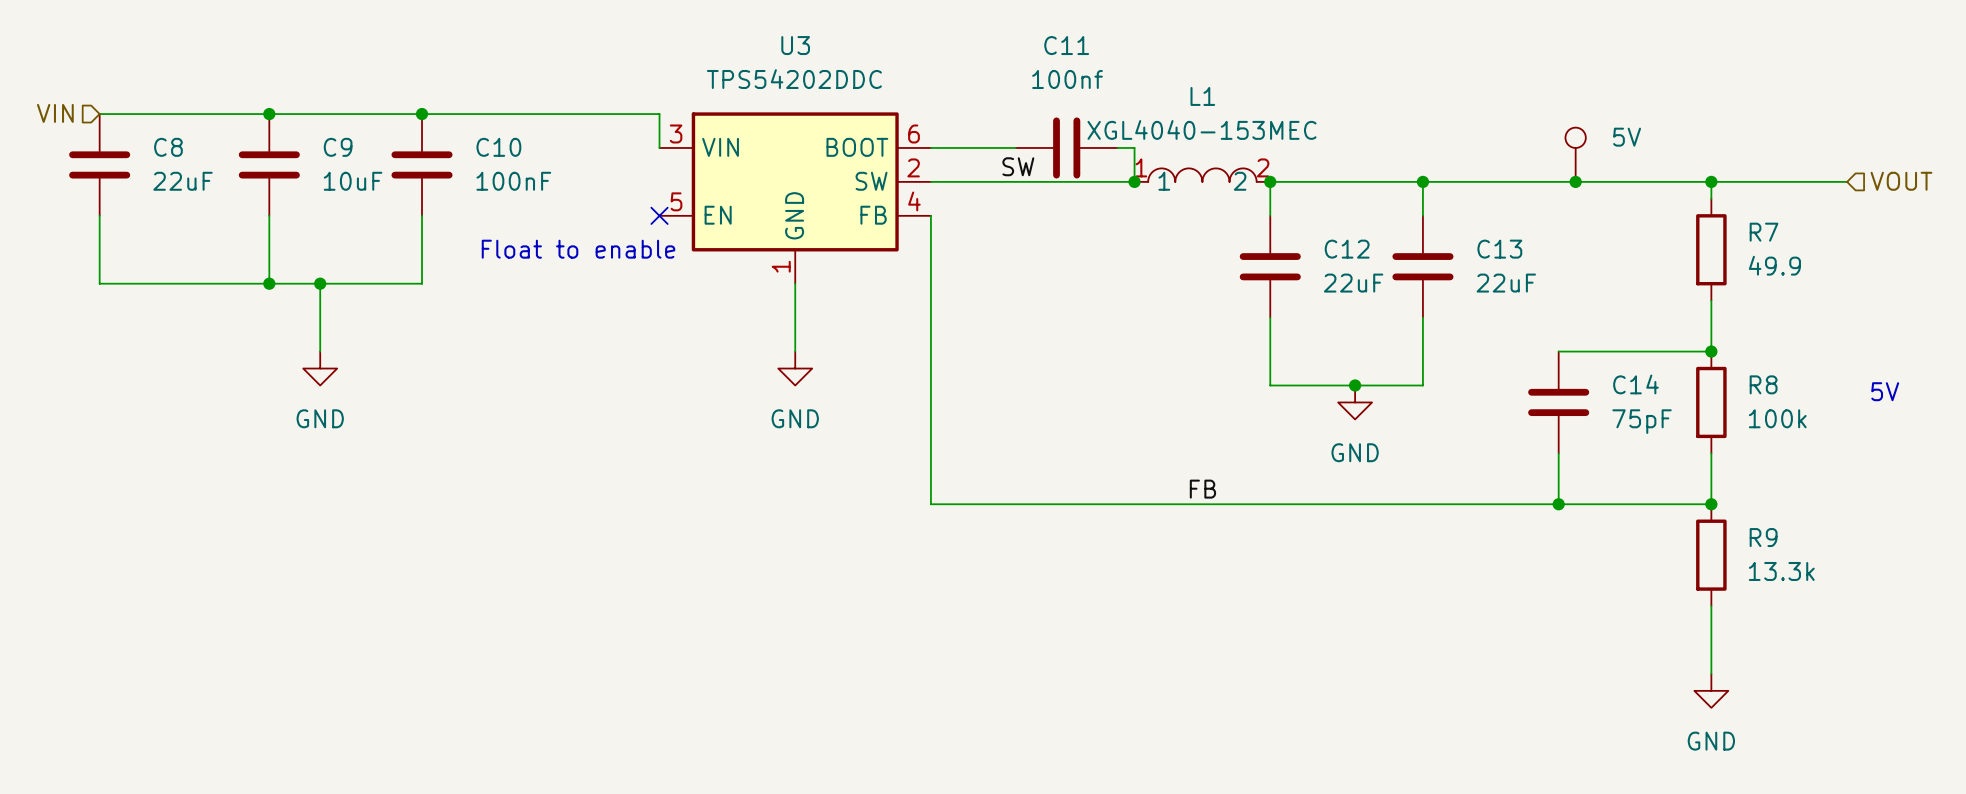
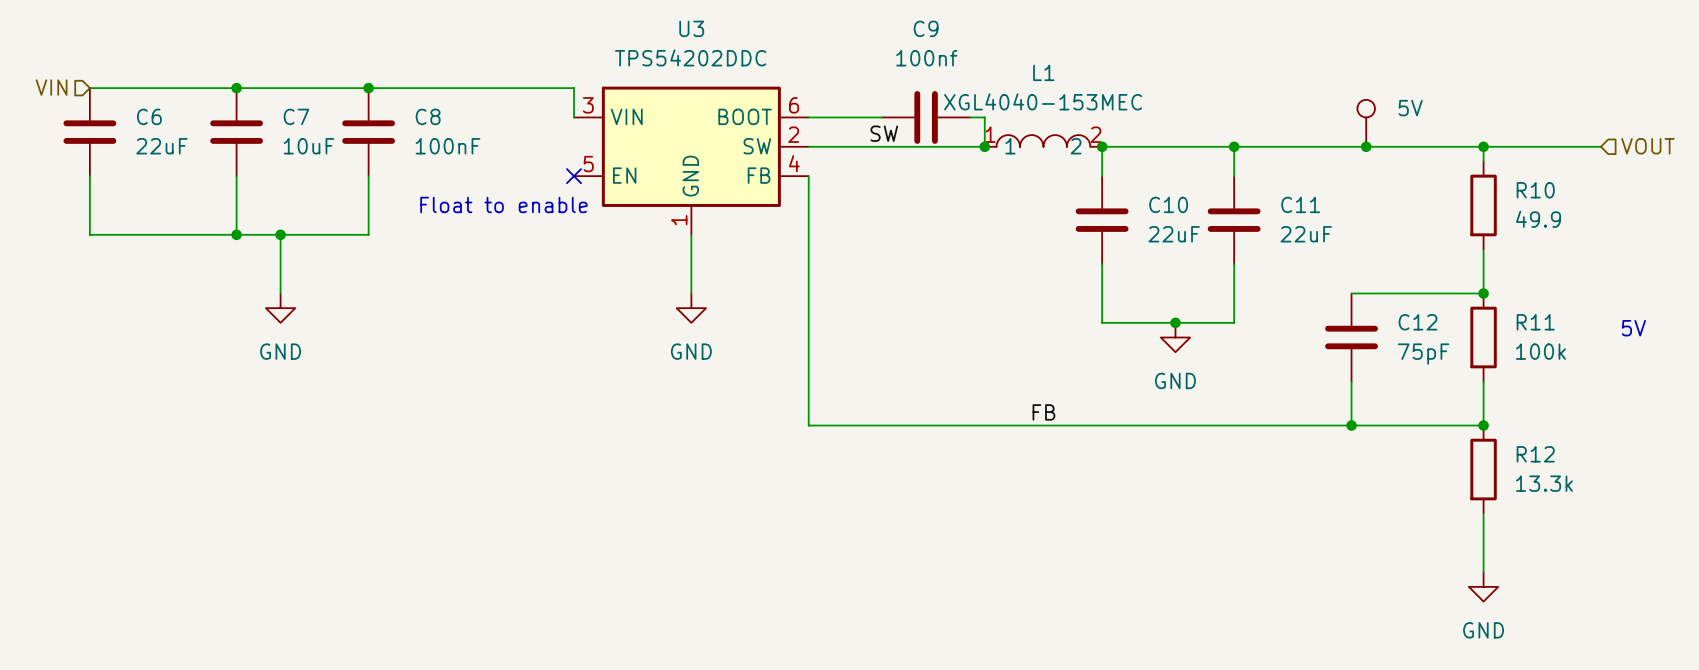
C11 name: C11 (1066, 45) -> C9 (926, 28)
C8 name: C8 (168, 147) -> C6 (149, 116)
C9 name: C9 (338, 147) -> C7 (296, 116)
C10 name: C10 (498, 147) -> C8 (428, 116)
R7 name: R7 (1764, 232) -> R10 (1535, 190)
C12 name: C12 (1347, 249) -> C10 (1168, 204)
C13 name: C13 (1499, 249) -> C11 (1300, 204)
C14 name: C14 (1635, 384) -> C12 (1418, 322)
R8 name: R8 (1763, 384) -> R11 (1535, 322)
R9 name: R9 (1763, 537) -> R12 (1535, 454)

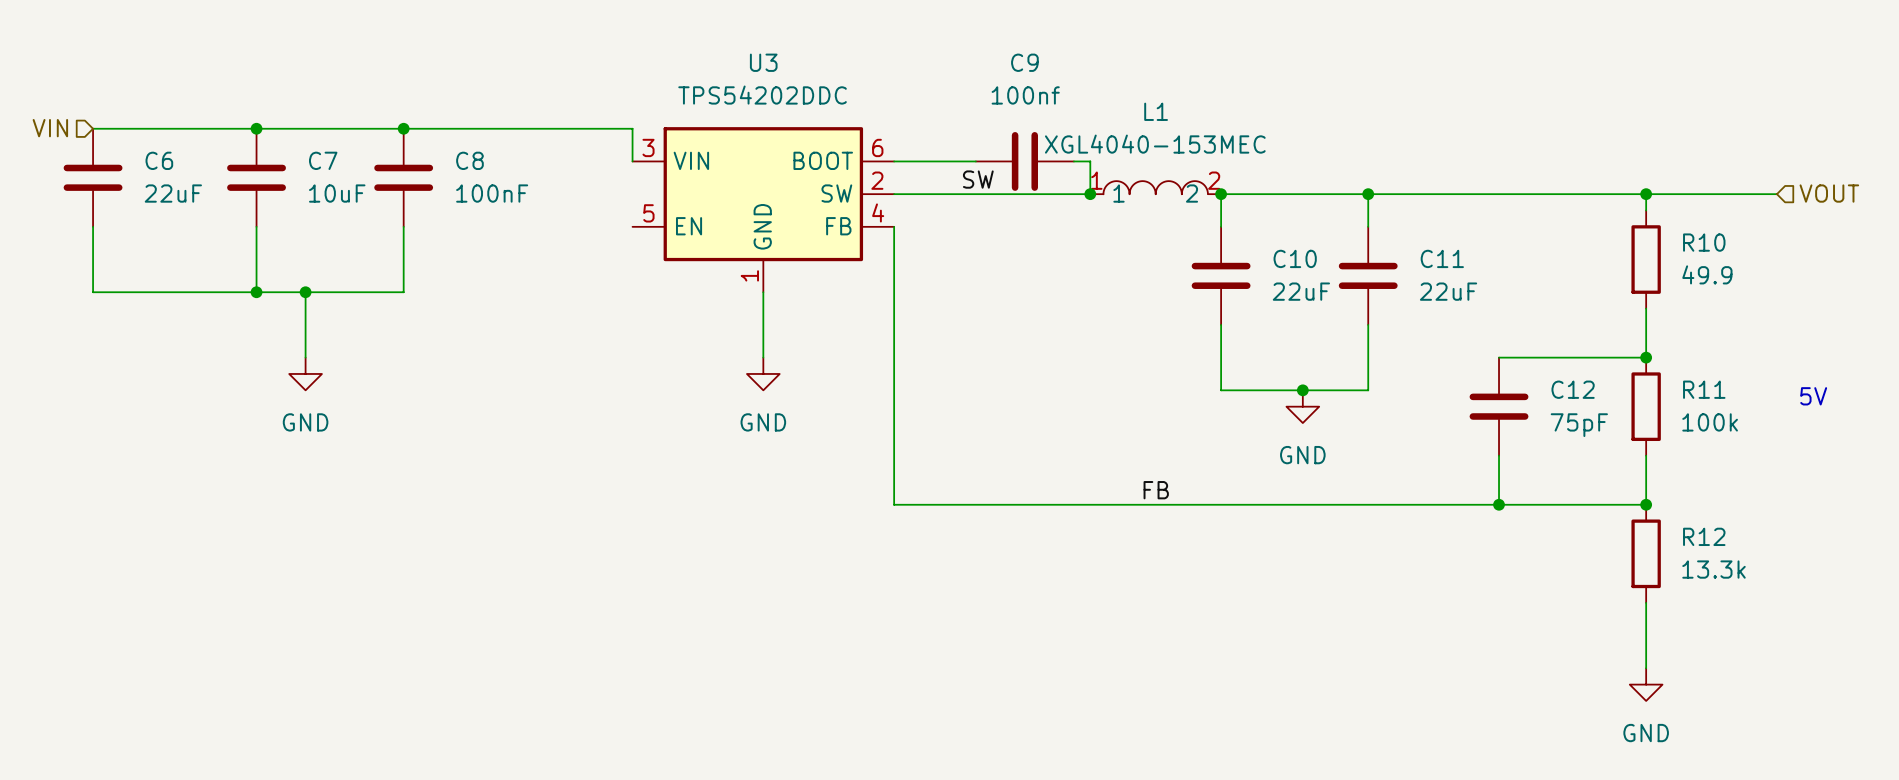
part: (1366, 123) -> none
junction: (1366, 146) -> none
no-connect mark: (574, 176) -> none
text: Float to enable (503, 204) -> none

